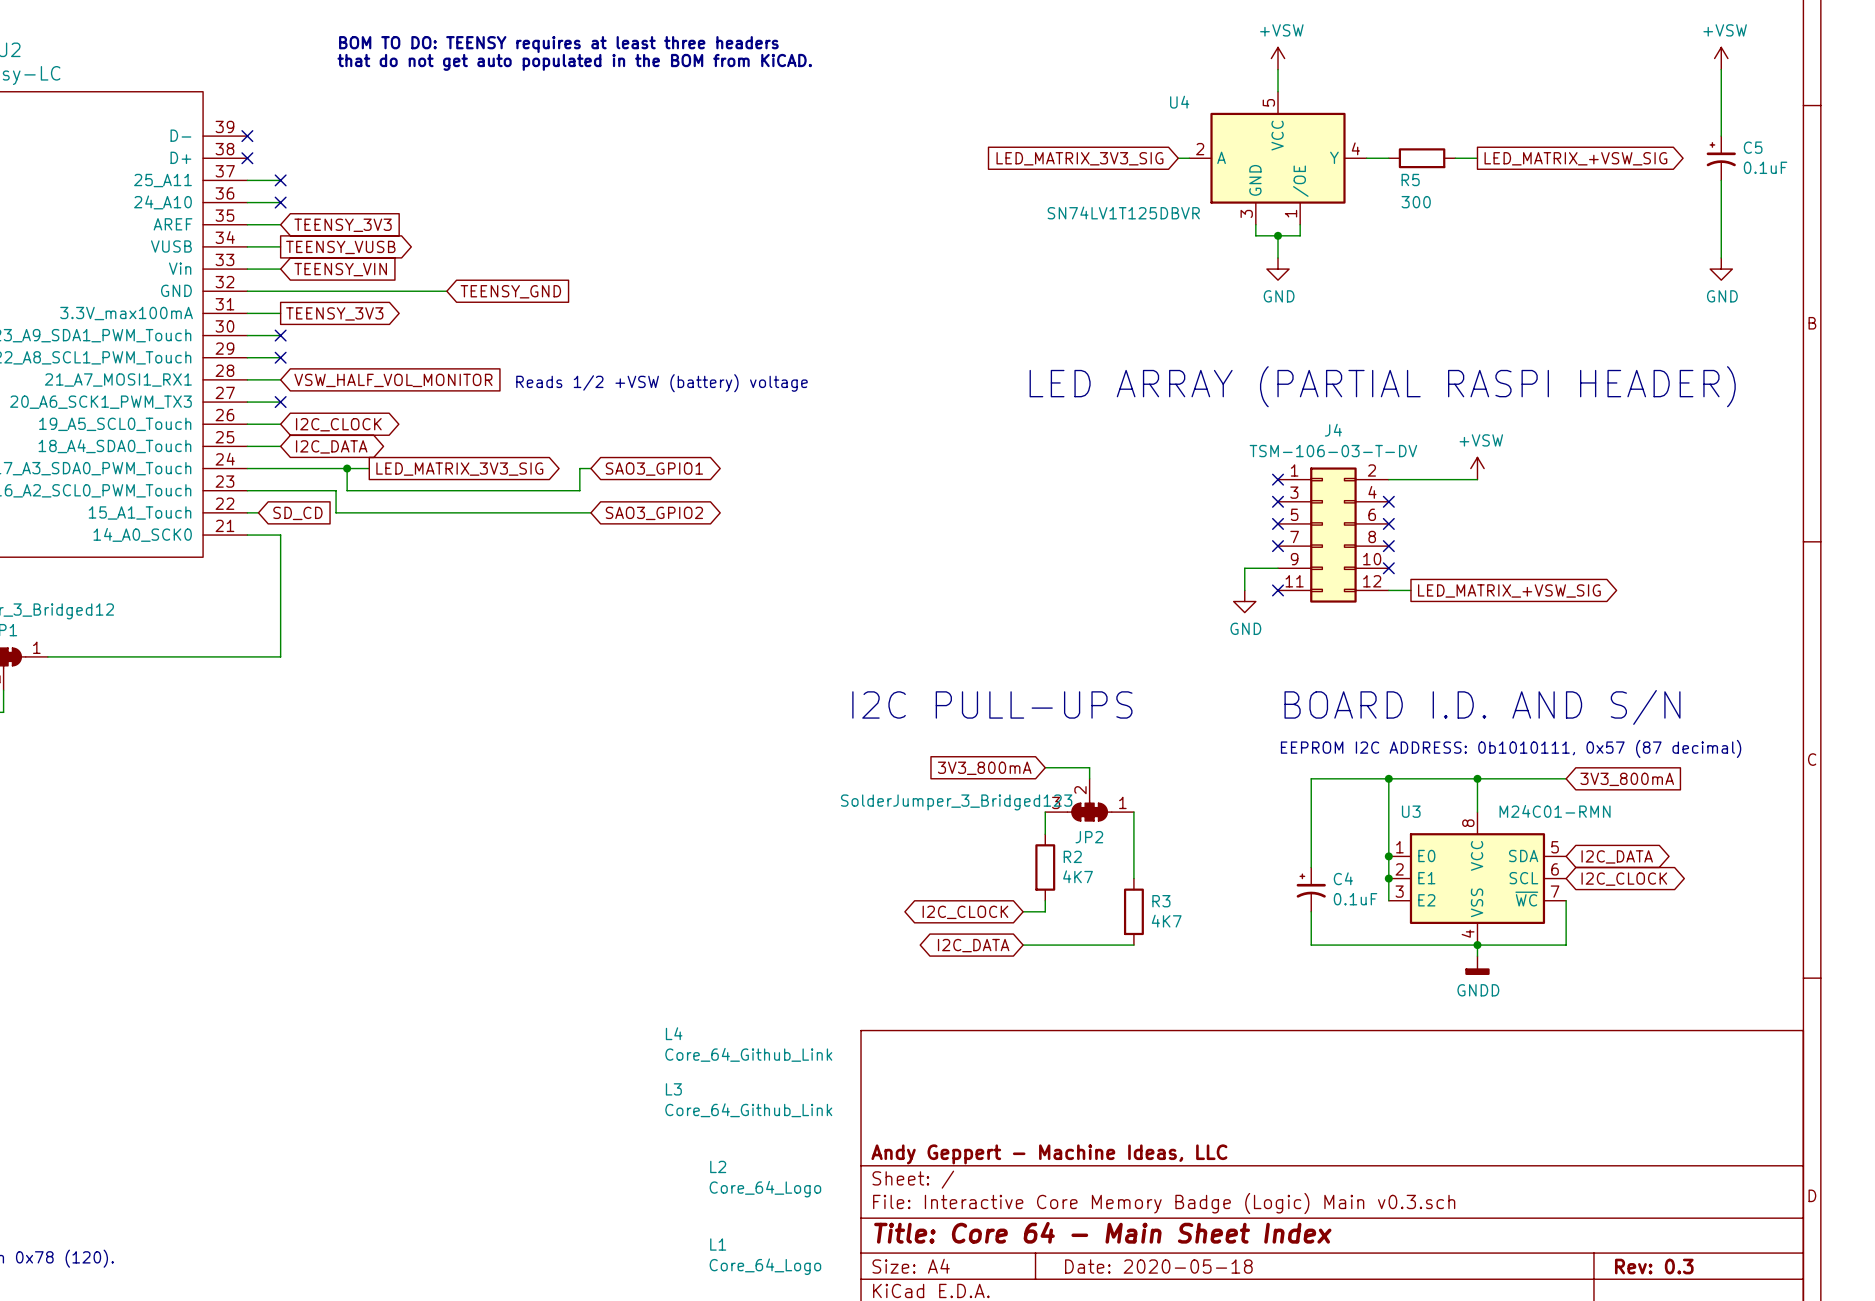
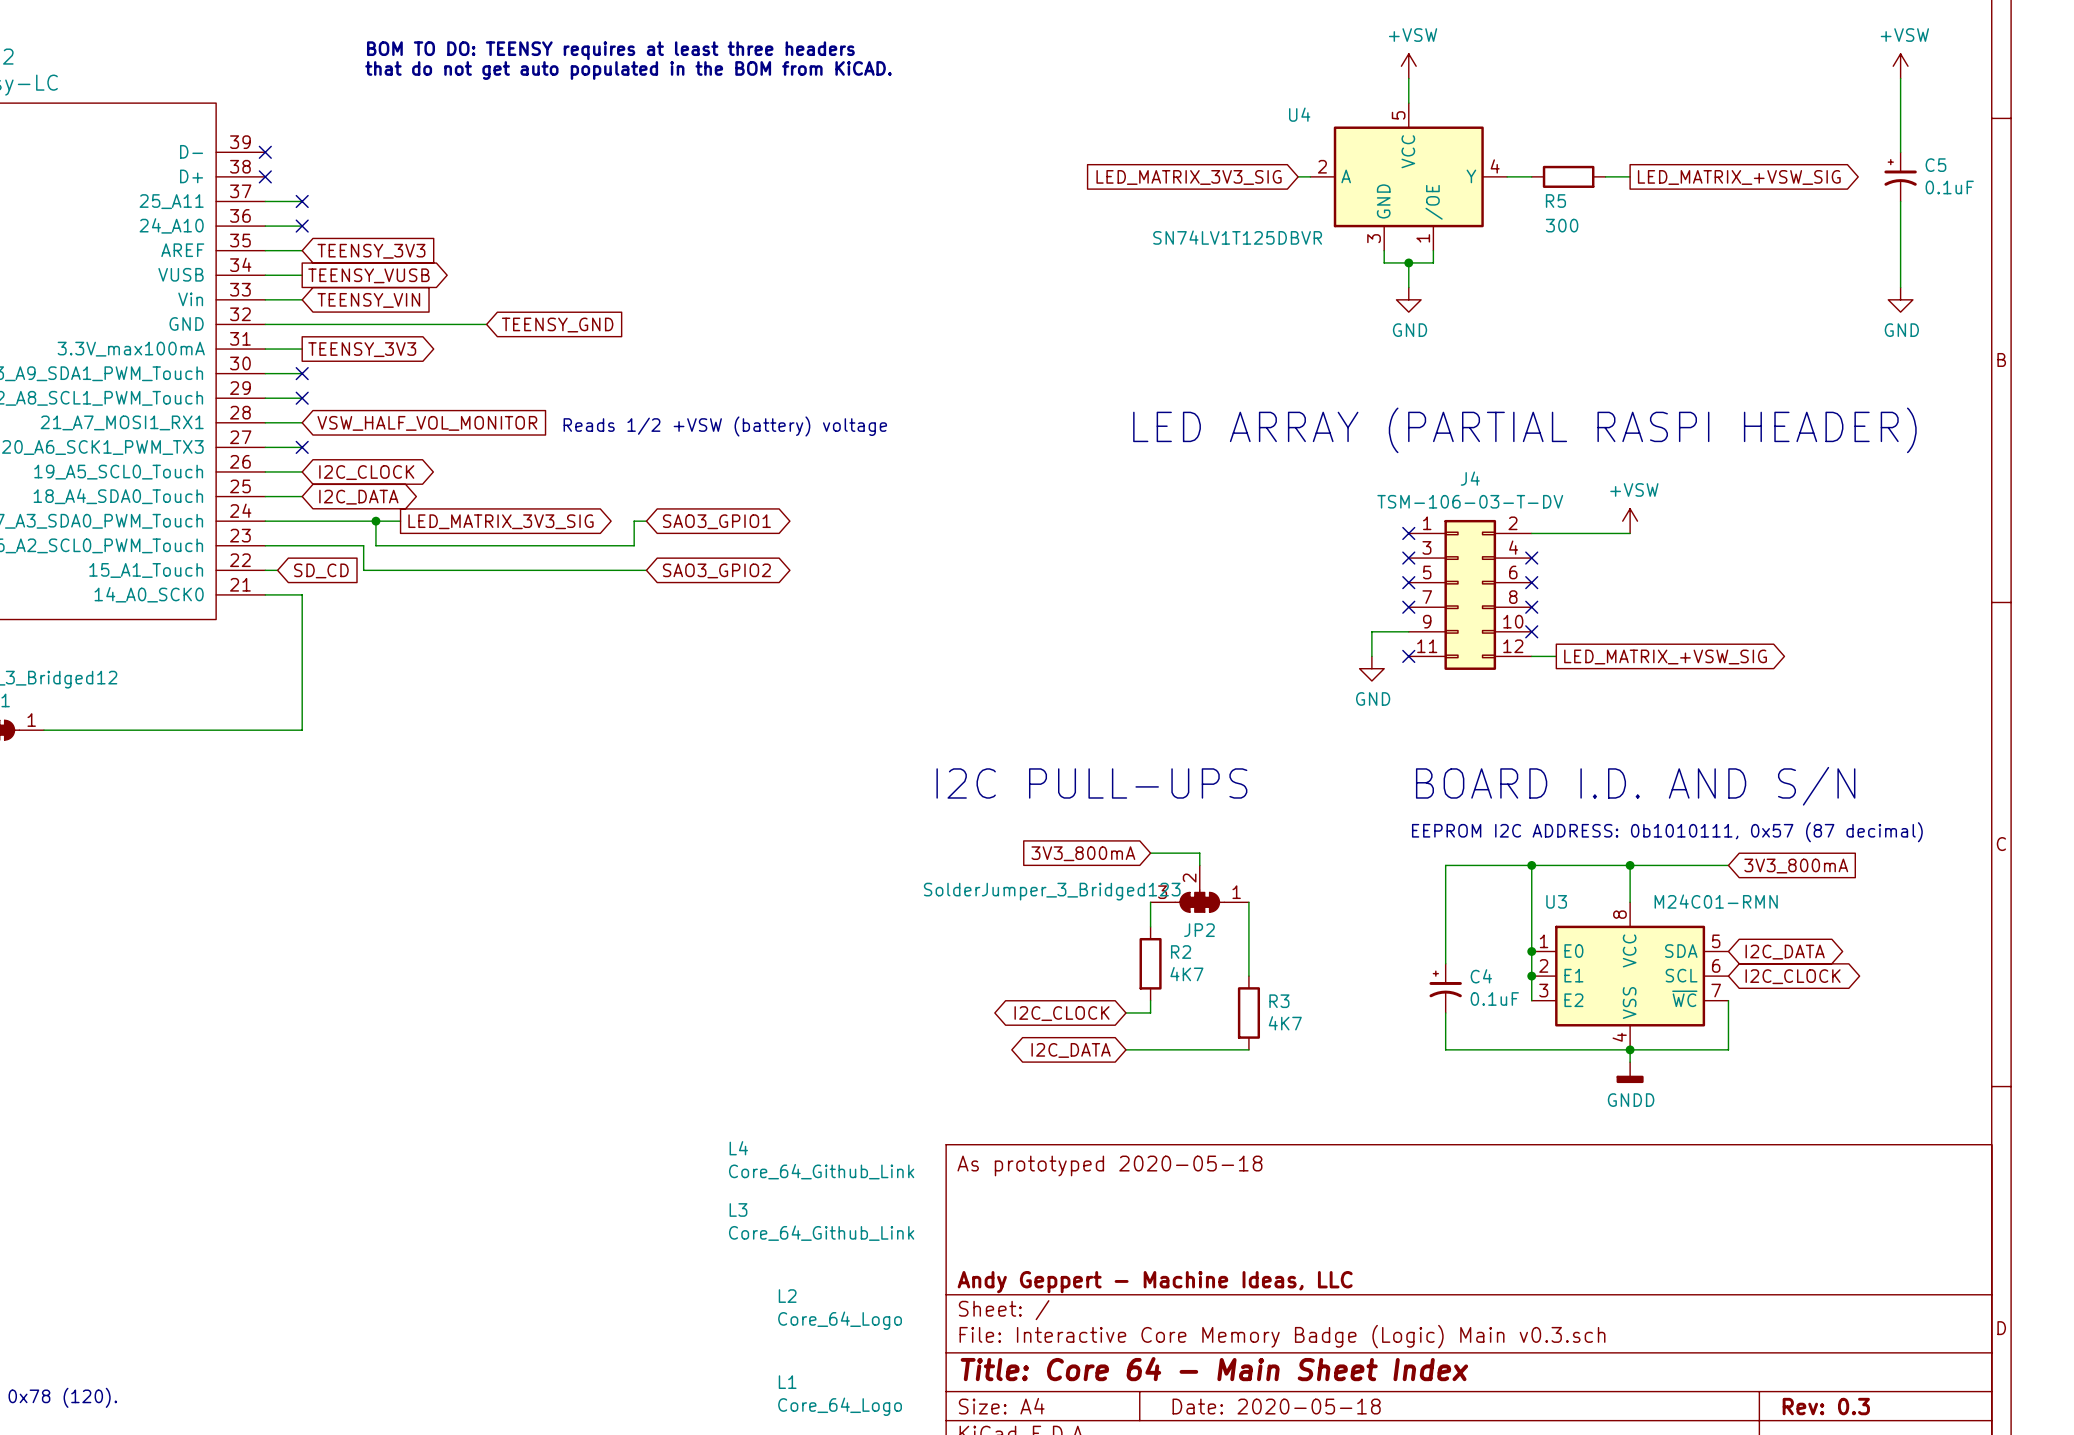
title block: none -> As prototyped 2020-05-18 (1109, 1165)

